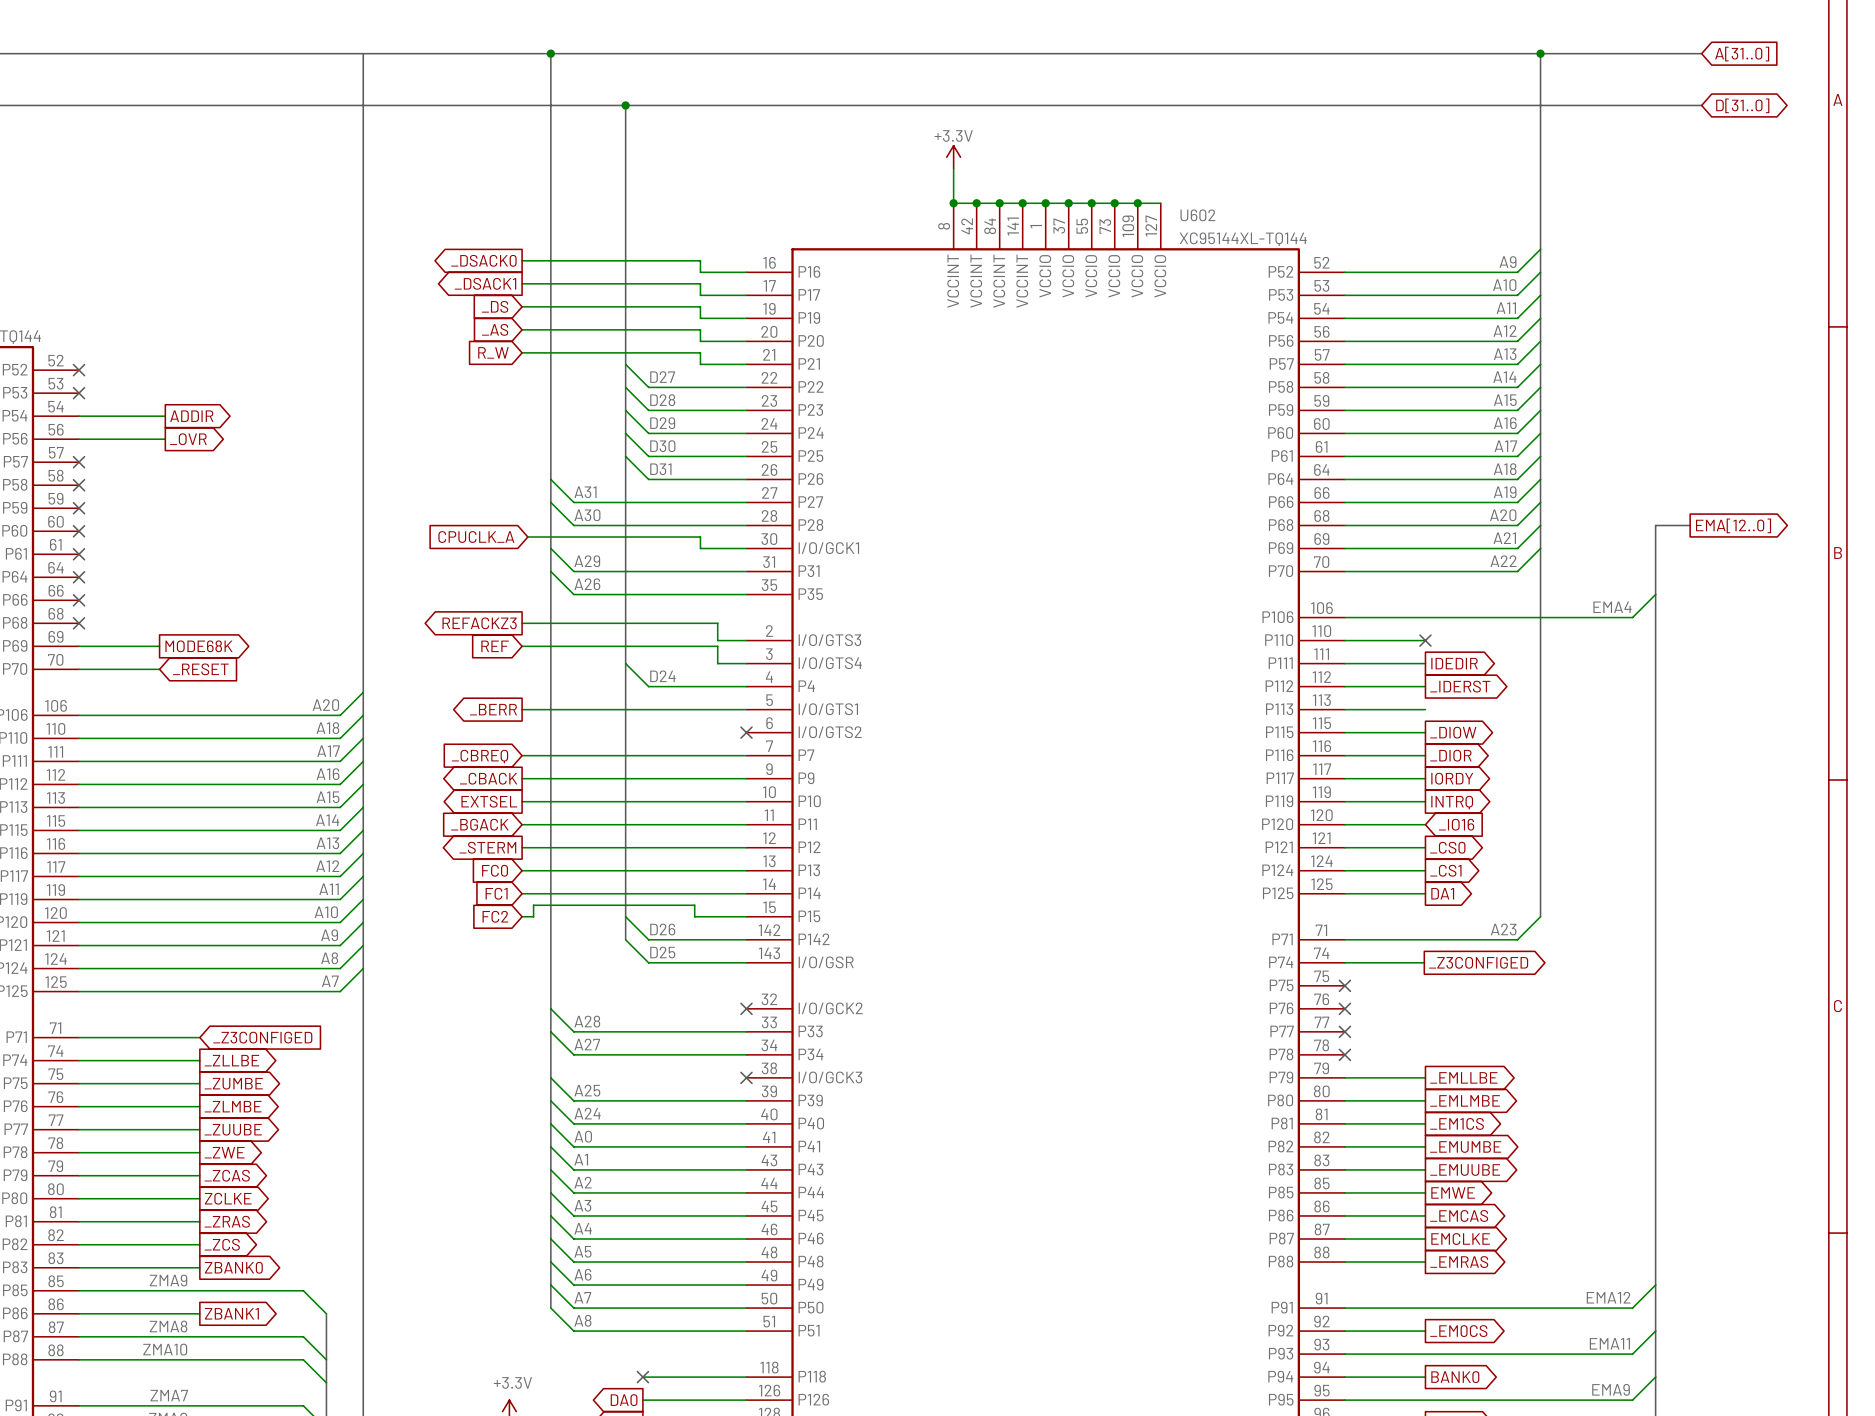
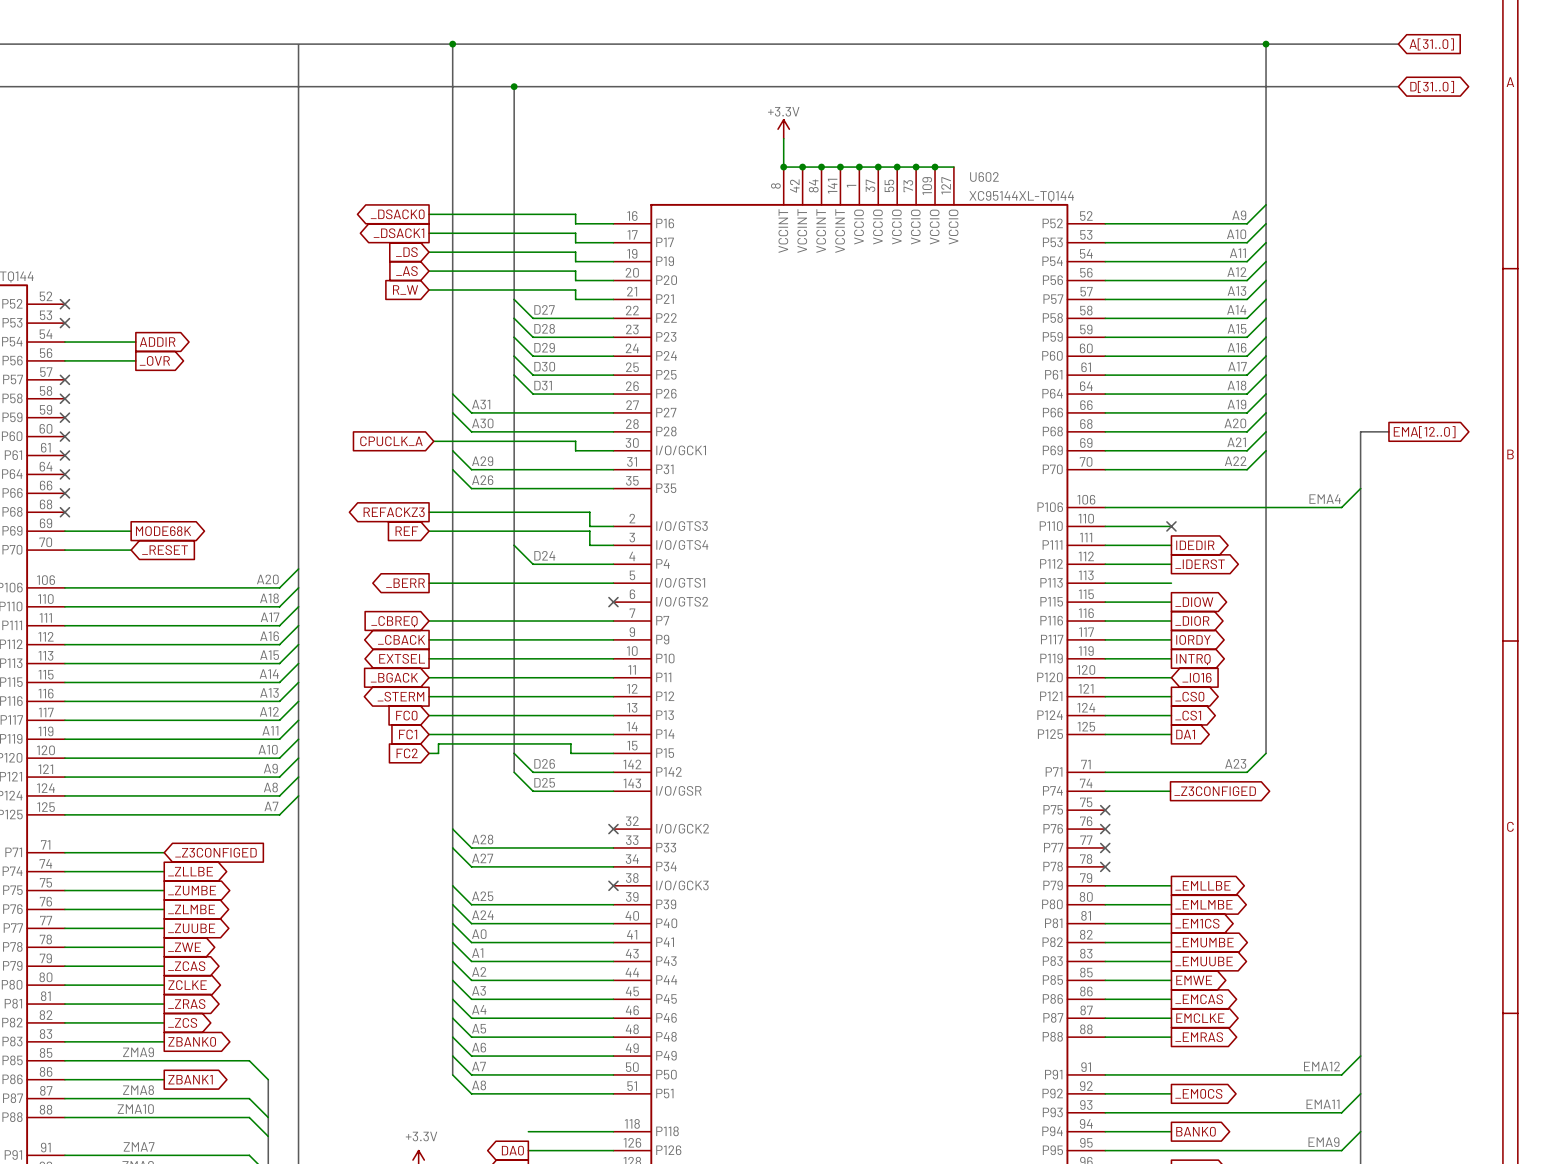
no-connect mark: (642, 1377) -> none

